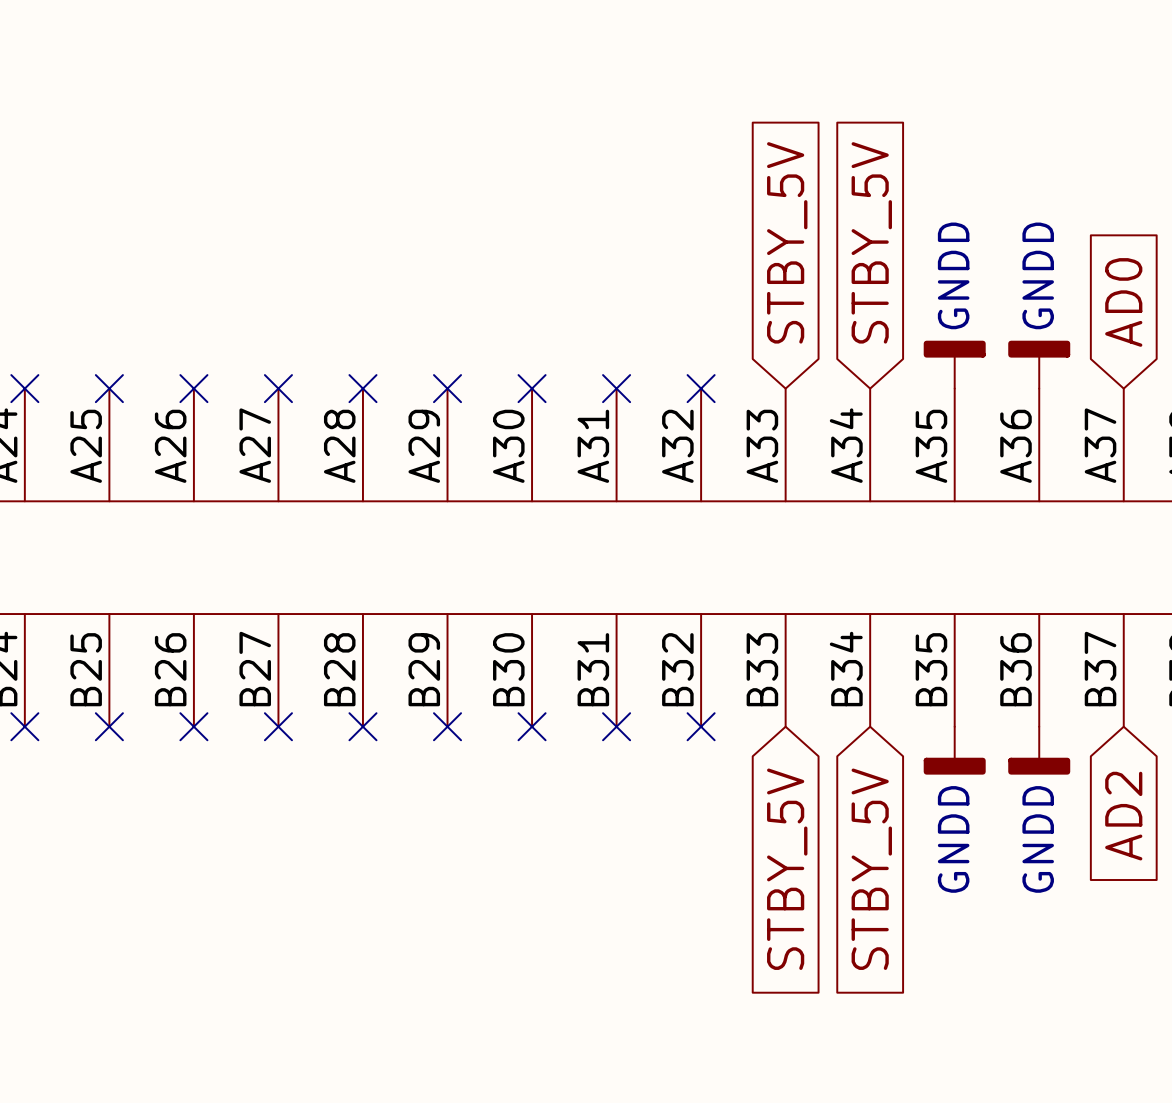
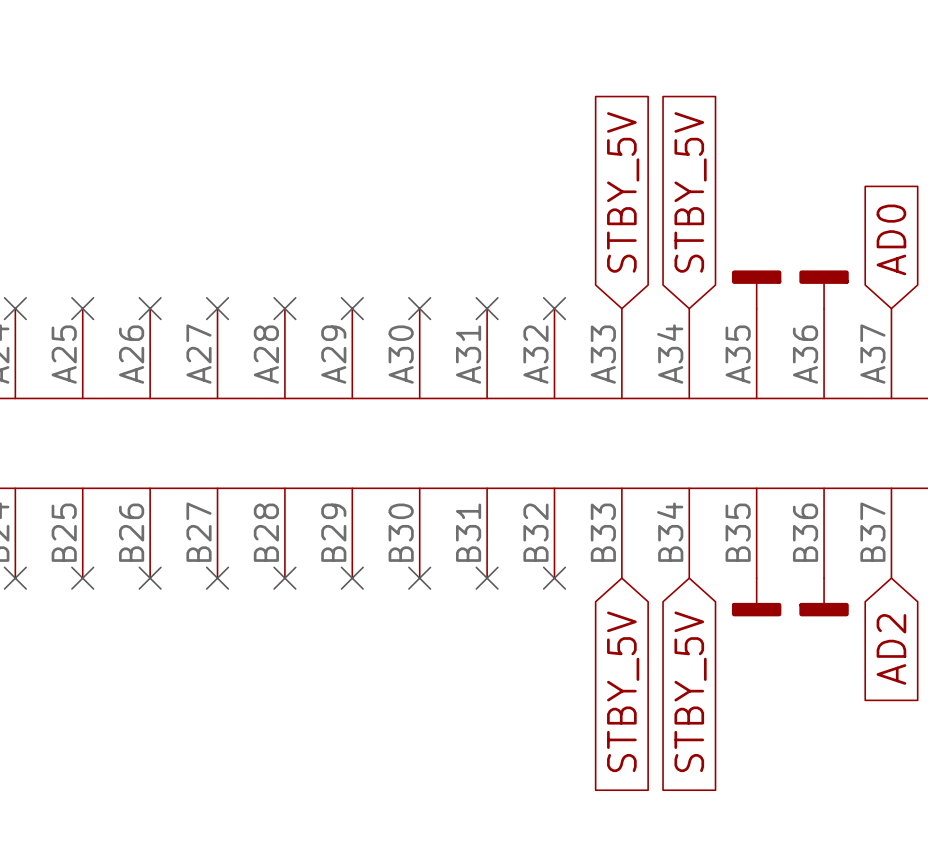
power symbol text: GNDD (953, 275) -> none
power symbol text: GNDD (1038, 275) -> none
power symbol text: GNDD (953, 839) -> none
power symbol text: GNDD (1038, 839) -> none

